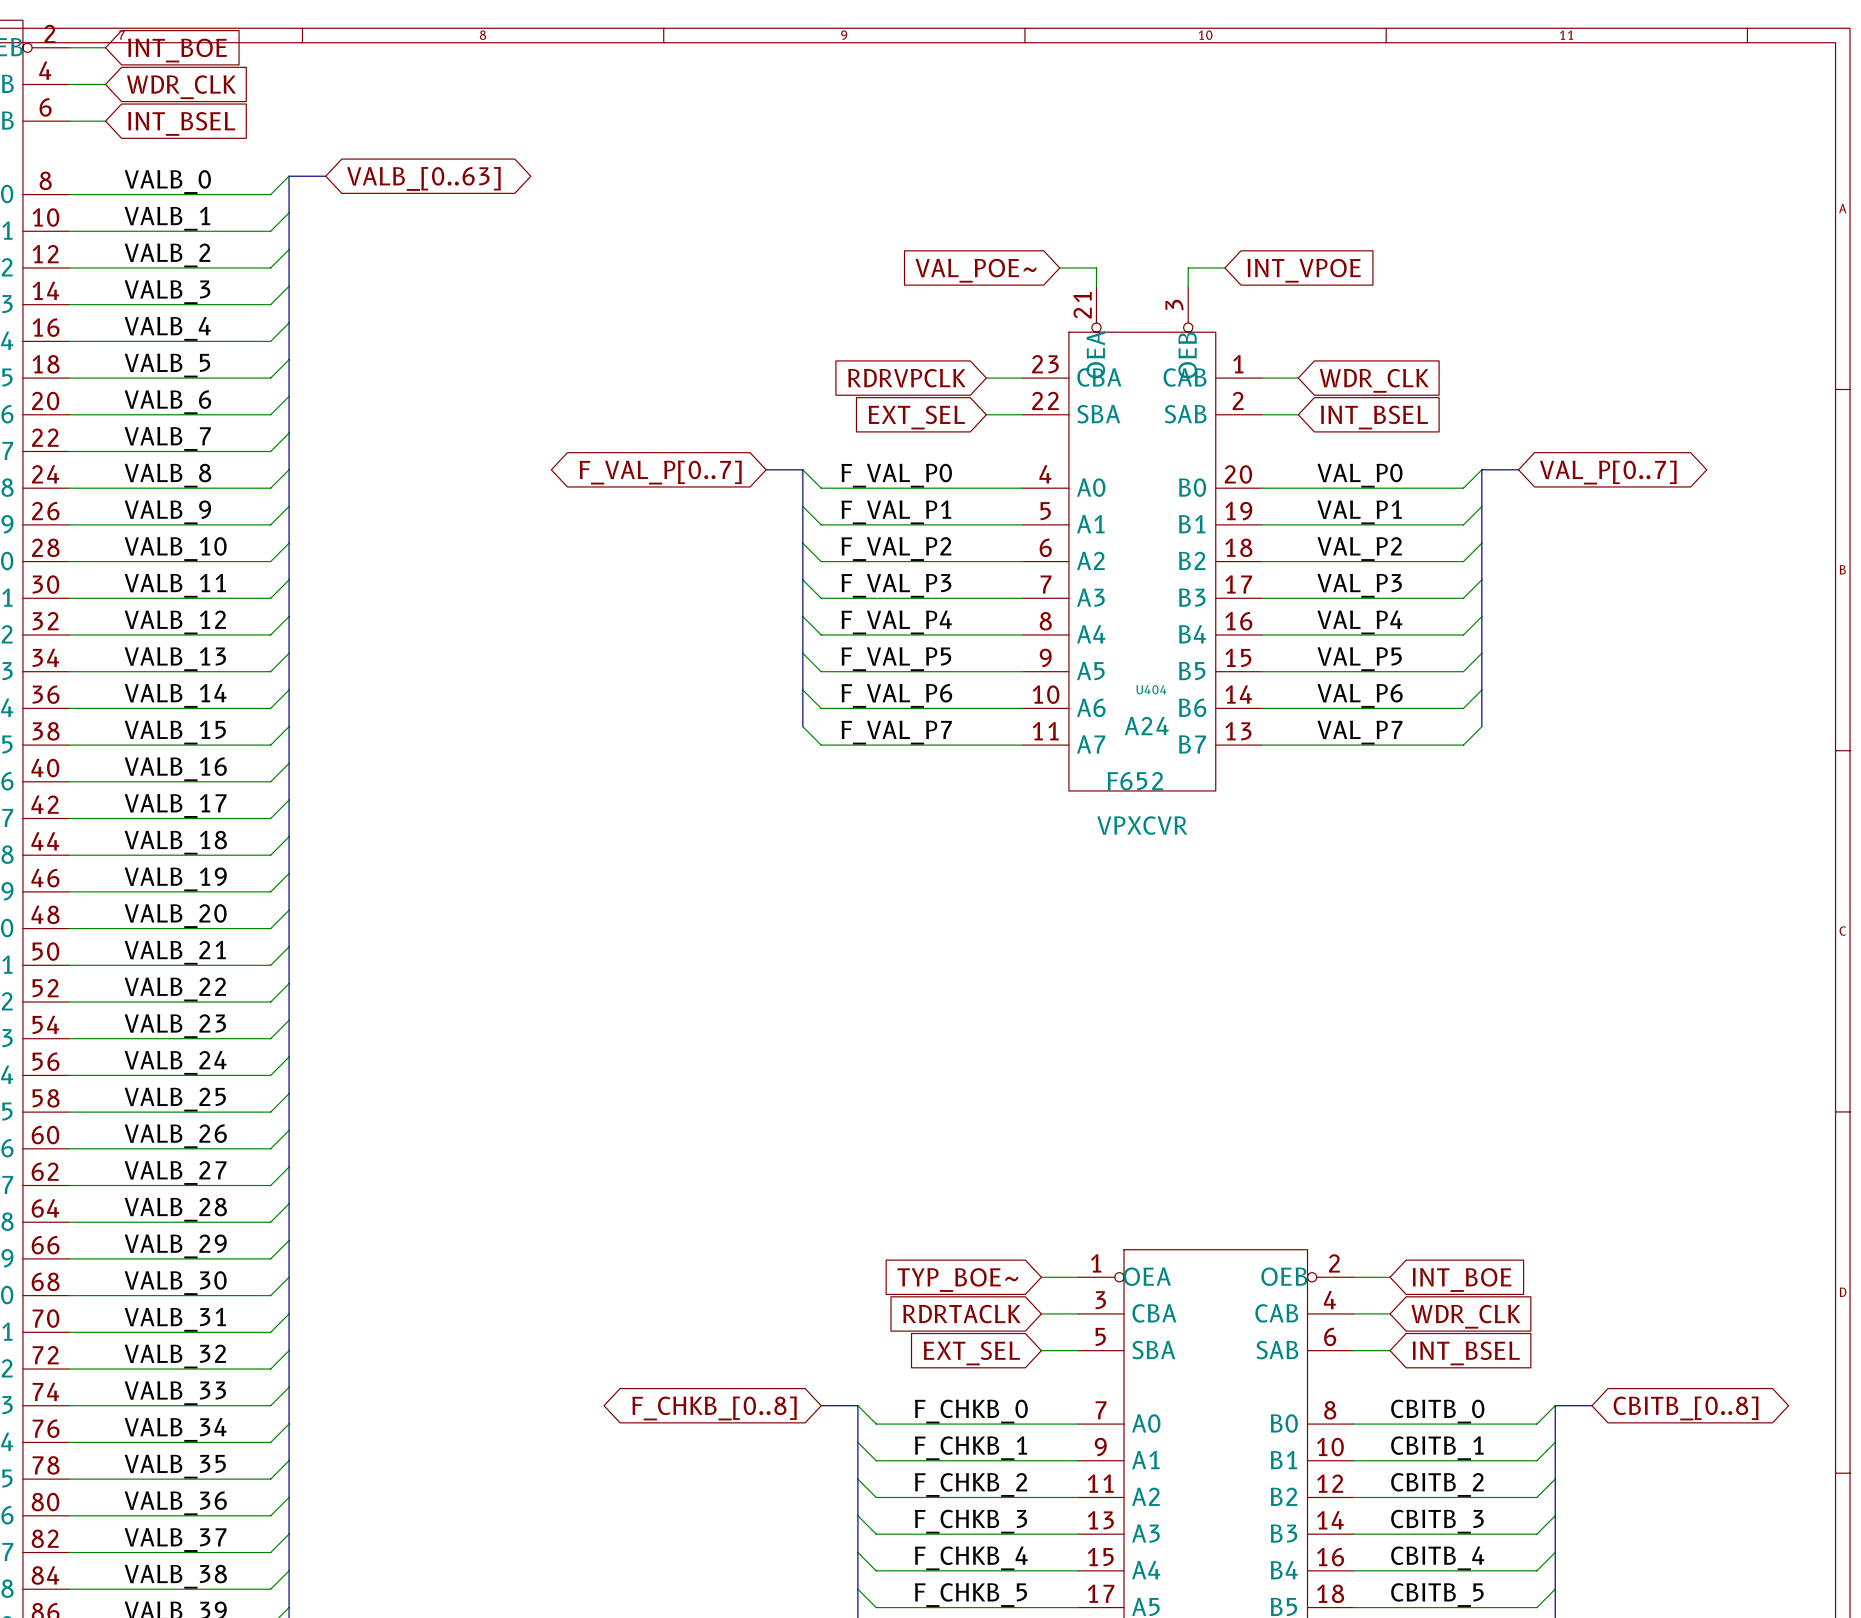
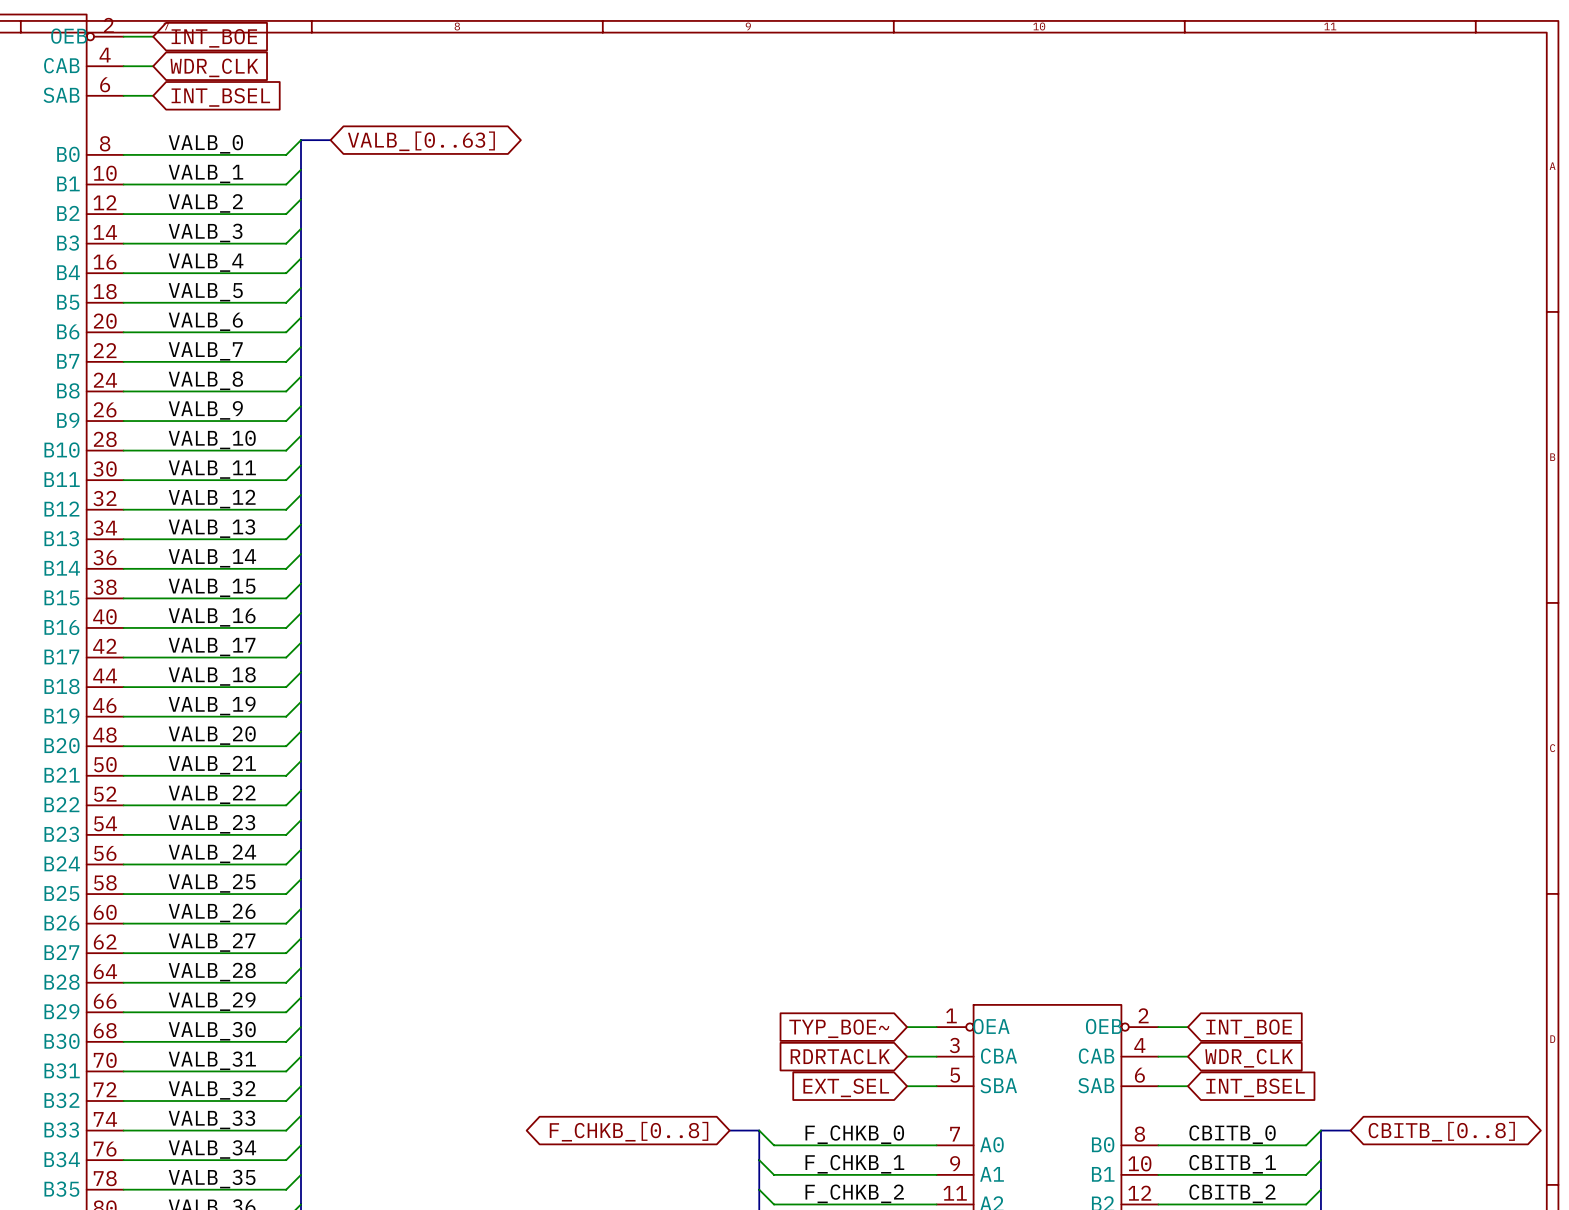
wire: (1059, 267) (1096, 267) (1096, 286) -> none
wire: (1224, 267) (1188, 267) (1188, 286) -> none
global label: VAL_POE~ (976, 270) -> none
global label: INT_VPOE (1304, 270) -> none
global label: RDRVPCLK (906, 378) -> none
wire: (986, 378) (1023, 378) -> none
wire: (1261, 378) (1298, 378) -> none
global label: WDR_CLK (1374, 380) -> none
wire: (986, 414) (1023, 414) -> none
wire: (1261, 414) (1298, 414) -> none
global label: EXT_SEL (916, 417) -> none
global label: INT_BSEL (1374, 417) -> none
bus: (766, 469) (802, 469) (802, 726) -> none
wire: (802, 469) (821, 488) (1023, 488) -> none
wire: (1481, 469) (1463, 488) (1261, 488) -> none
bus: (1518, 469) (1481, 469) (1481, 726) -> none
global label: F_VAL_P[0..7] (660, 472) -> none
global label: VAL_P[0..7] (1608, 472) -> none
label: F_VAL_P0 (896, 475) -> none
label: VAL_P0 (1360, 475) -> none
wire: (802, 506) (821, 524) (1023, 524) -> none
wire: (1481, 506) (1463, 524) (1261, 524) -> none
label: F_VAL_P1 (896, 512) -> none
label: VAL_P1 (1359, 512) -> none
U404: F652 (1142, 538) -> none
wire: (802, 543) (821, 561) (1023, 561) -> none
wire: (1481, 543) (1463, 561) (1261, 561) -> none
label: F_VAL_P2 (896, 549) -> none
label: VAL_P2 (1359, 549) -> none
wire: (802, 579) (821, 598) (1023, 598) -> none
wire: (1481, 579) (1463, 598) (1261, 598) -> none
label: F_VAL_P3 (896, 585) -> none
label: VAL_P3 (1359, 585) -> none
wire: (802, 616) (821, 634) (1023, 634) -> none
wire: (1481, 616) (1463, 634) (1261, 634) -> none
label: F_VAL_P4 (896, 622) -> none
label: VAL_P4 (1359, 622) -> none
wire: (802, 653) (821, 671) (1023, 671) -> none
wire: (1481, 653) (1463, 671) (1261, 671) -> none
label: F_VAL_P5 (896, 659) -> none
label: VAL_P5 (1359, 659) -> none
wire: (802, 690) (821, 708) (1023, 708) -> none
wire: (1481, 690) (1463, 708) (1261, 708) -> none
label: F_VAL_P6 (896, 695) -> none
label: VAL_P6 (1360, 695) -> none
wire: (802, 726) (821, 745) (1023, 745) -> none
wire: (1481, 726) (1463, 745) (1261, 745) -> none
label: F_VAL_P7 (896, 732) -> none
label: VAL_P7 (1359, 732) -> none

